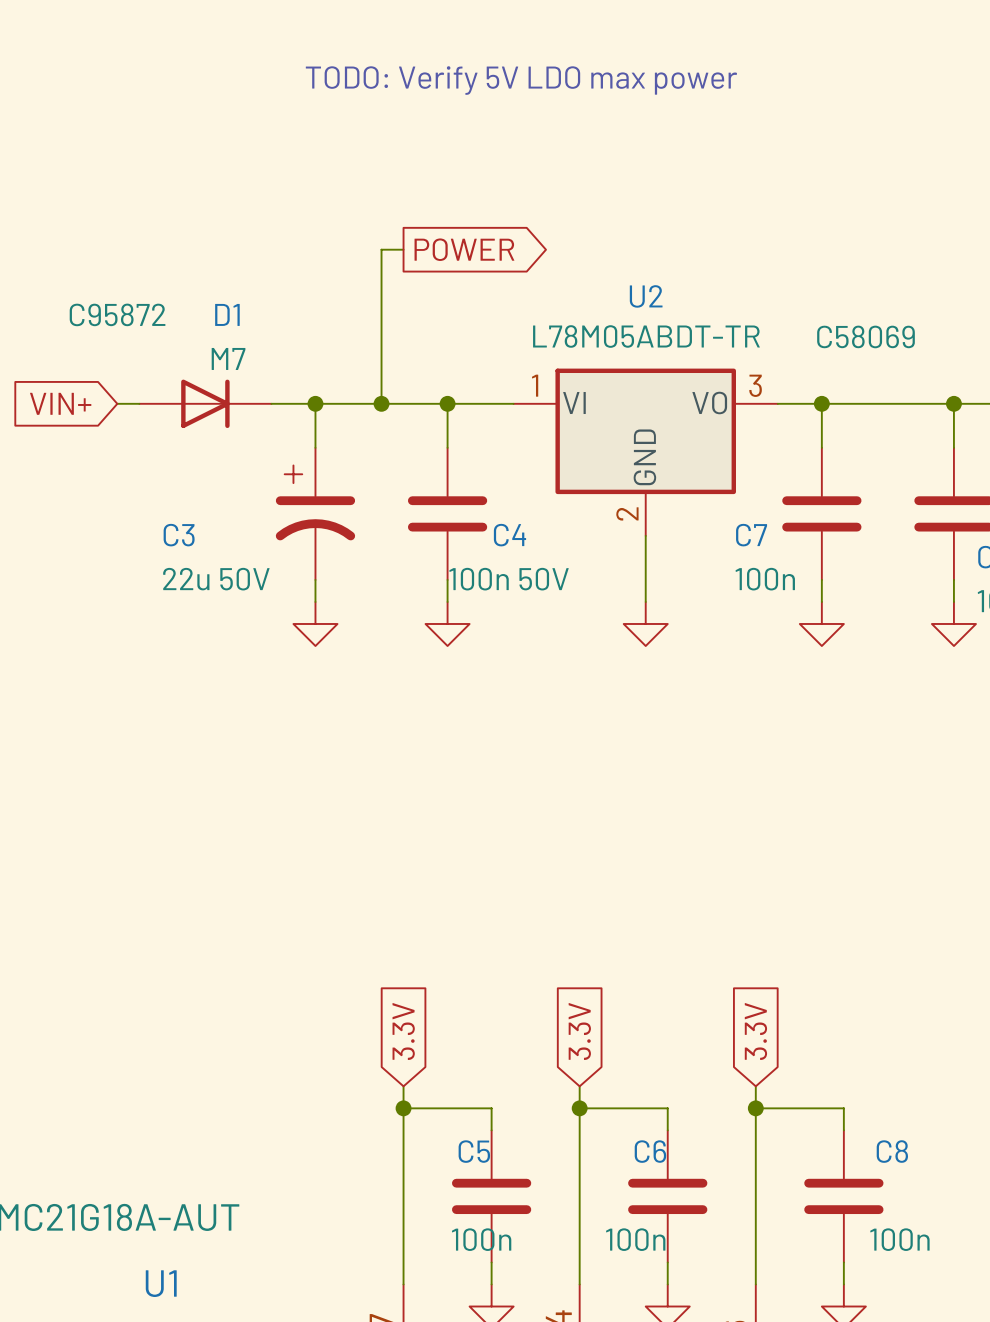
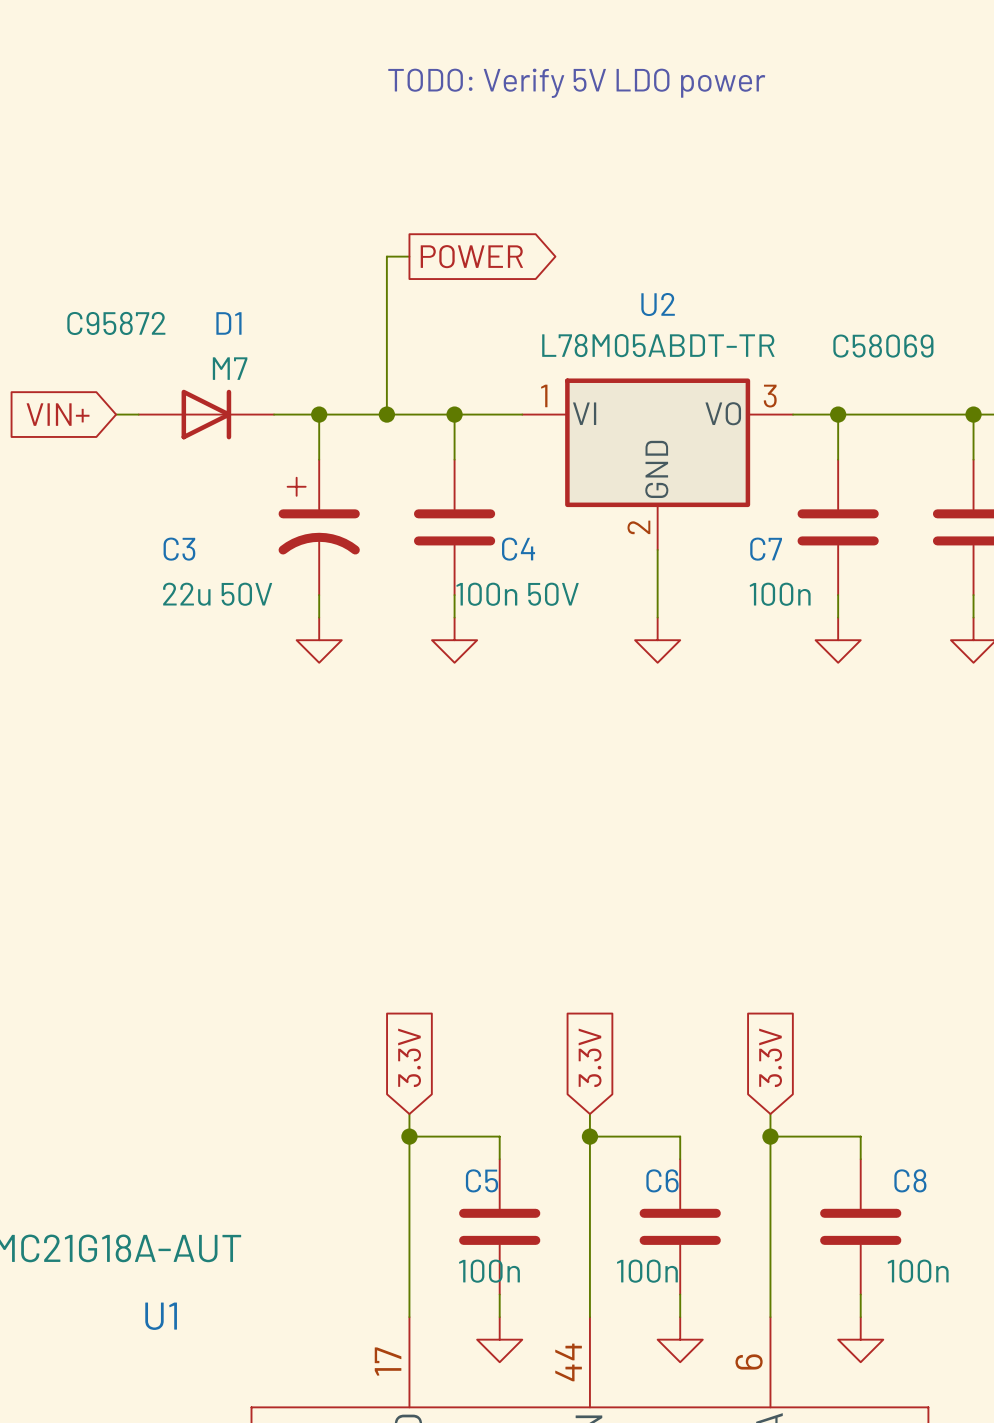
text: TODO: Verify 5V LDO max power (521, 80) -> TODO: Verify 5V LDO power (576, 83)

